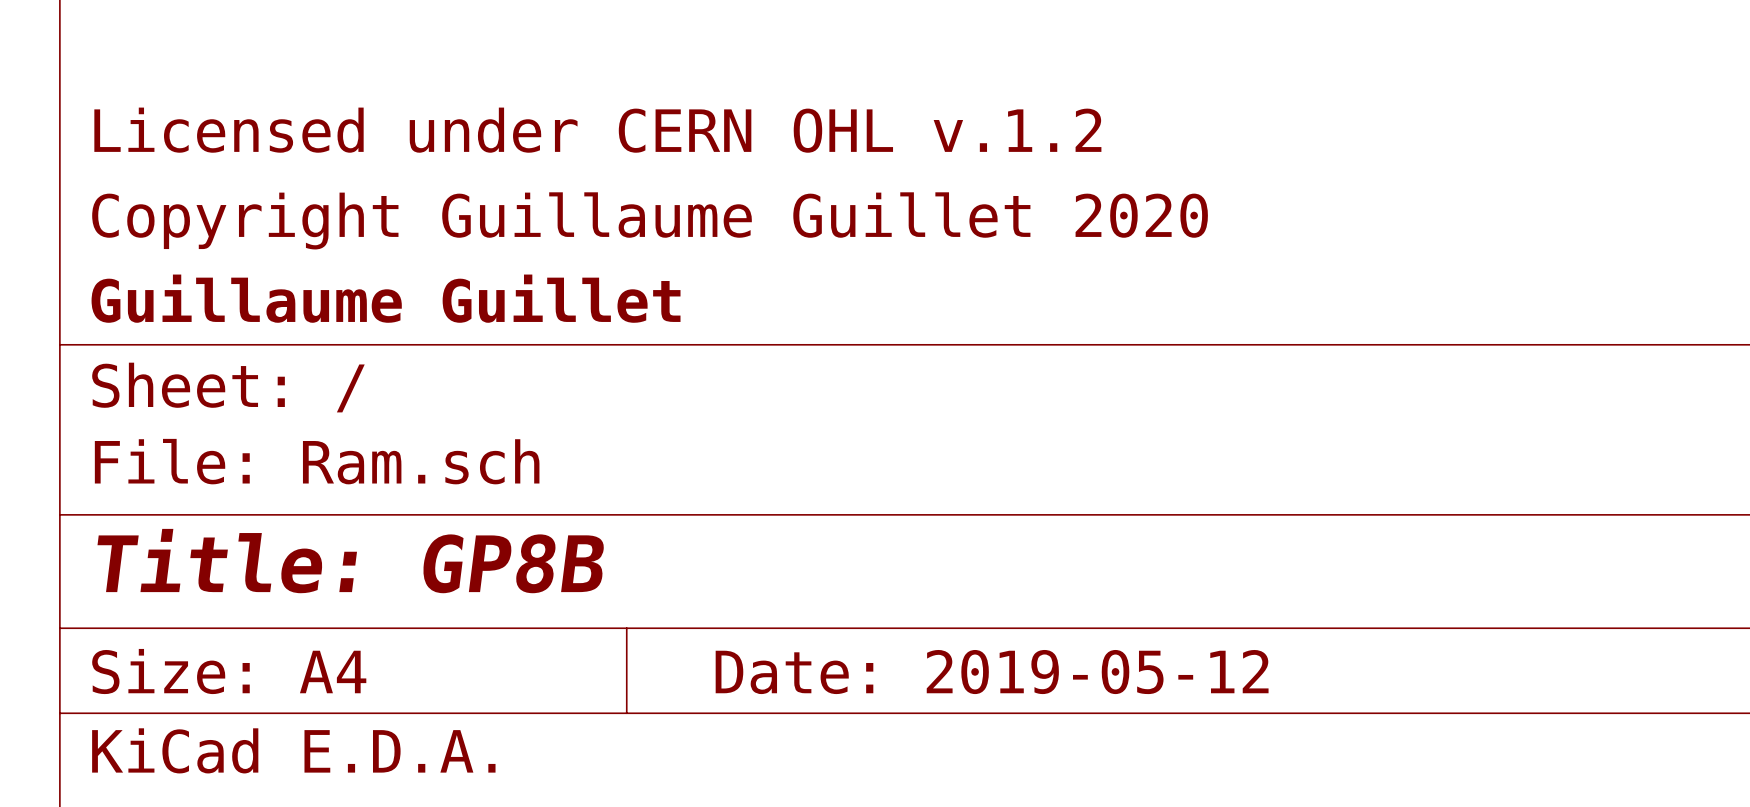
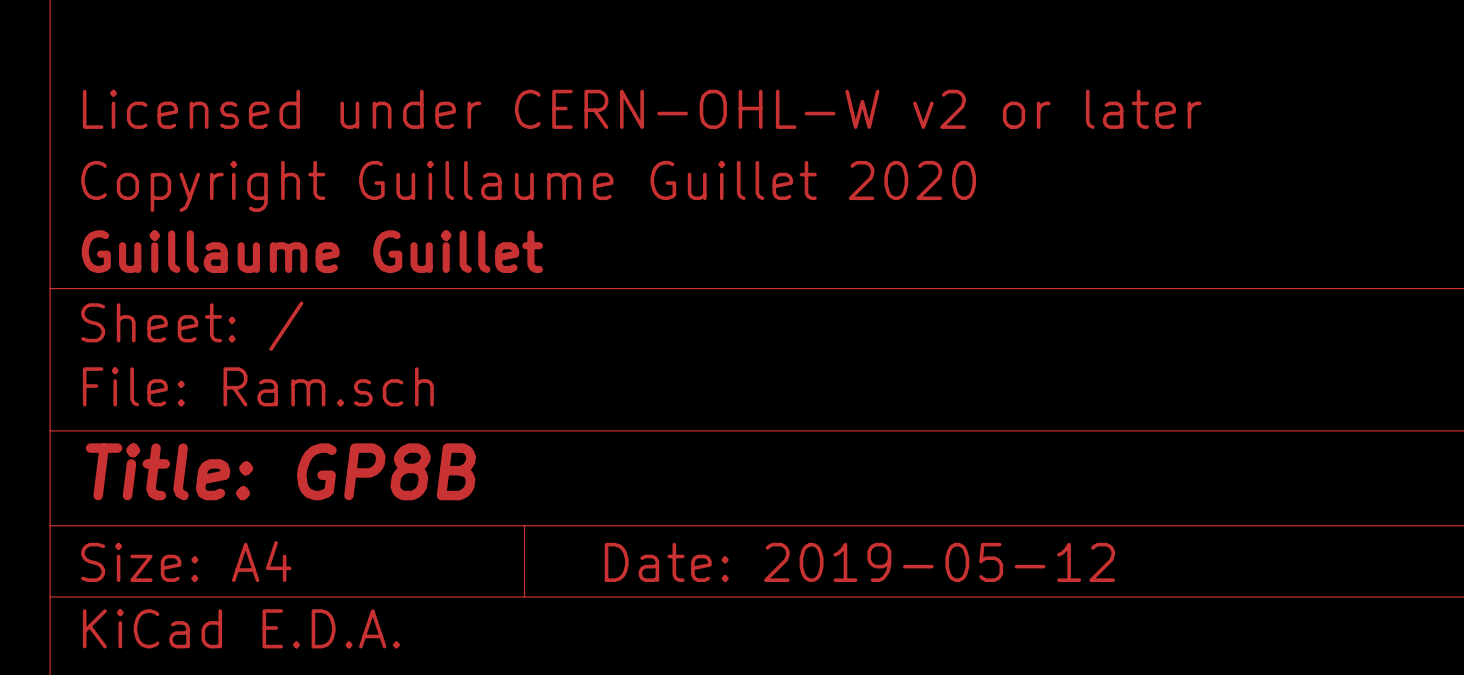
title block: Licensed under CERN OHL v.1.2 (597, 130) -> Licensed under CERN-OHL-W v2 or later (642, 109)

